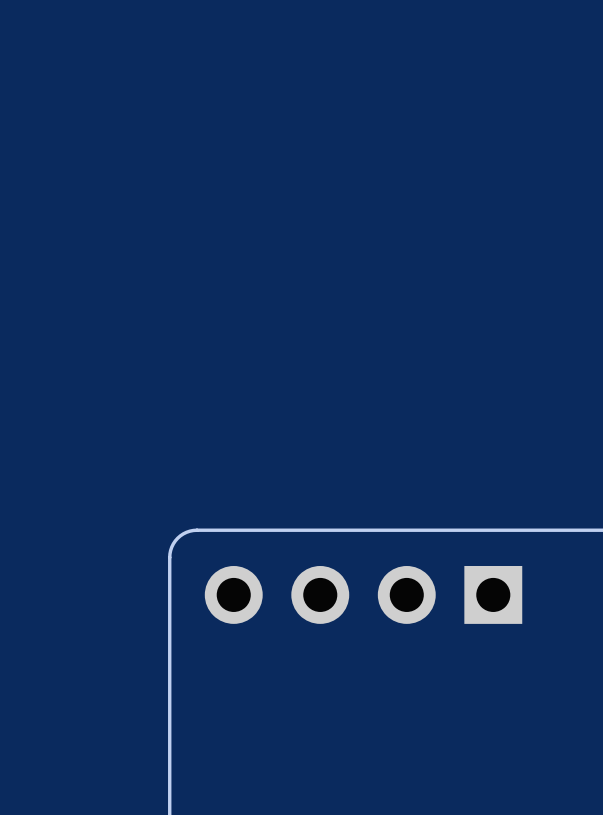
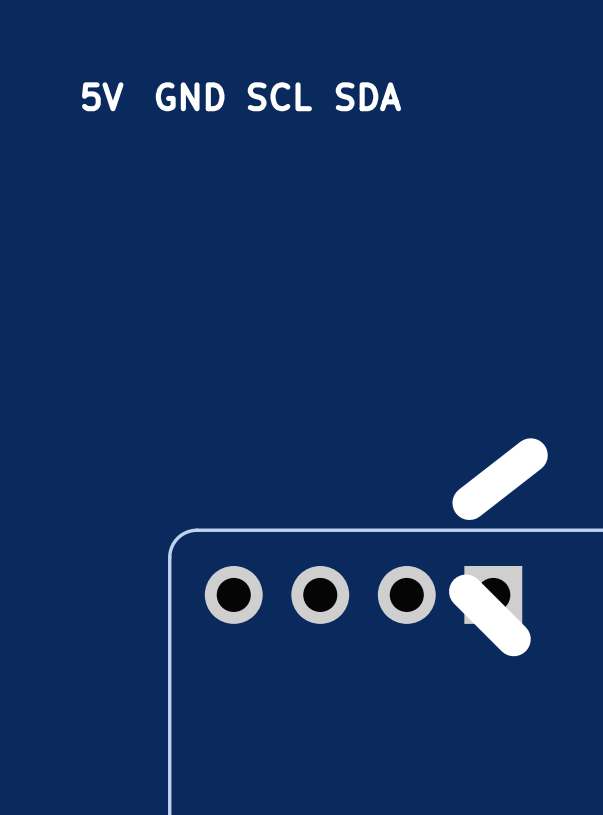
text: none -> 5V (102, 96)
text: none -> GND (190, 96)
text: none -> SCL (279, 96)
text: none -> SDA (368, 96)
line: none -> (530, 455) (469, 502)
line: none -> (466, 591) (513, 639)

